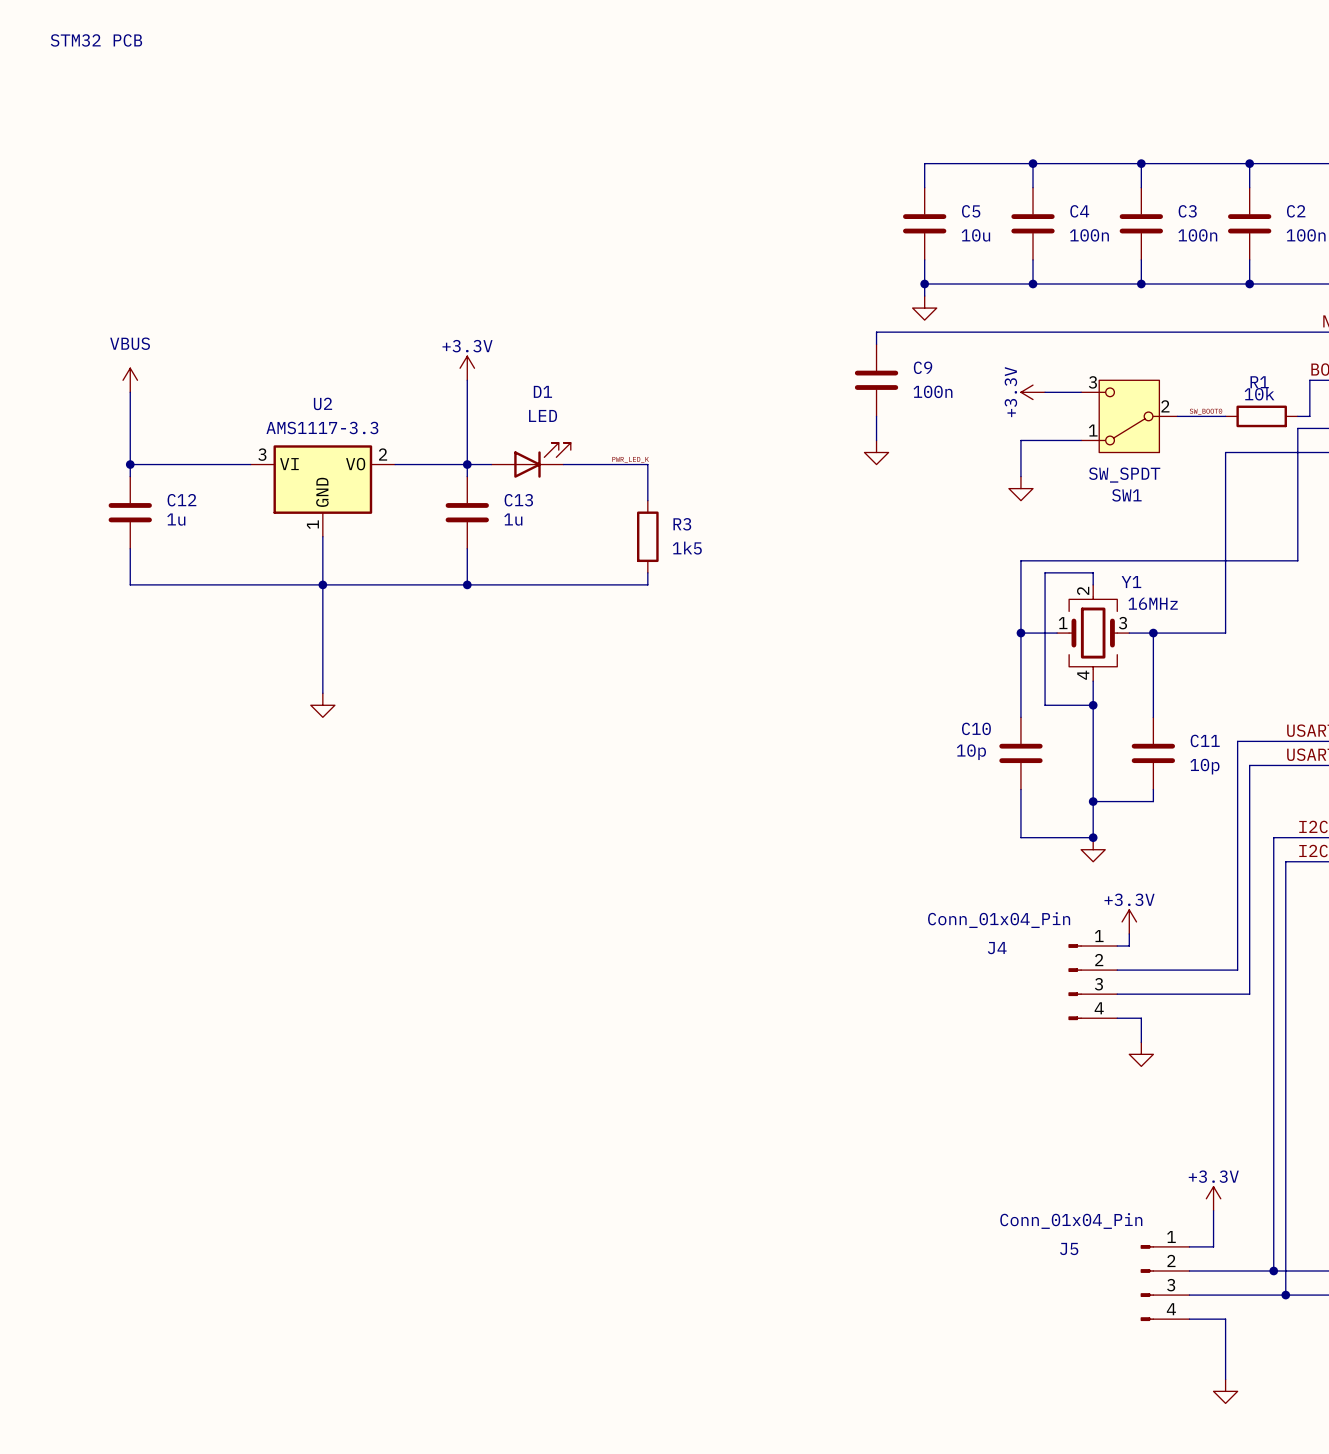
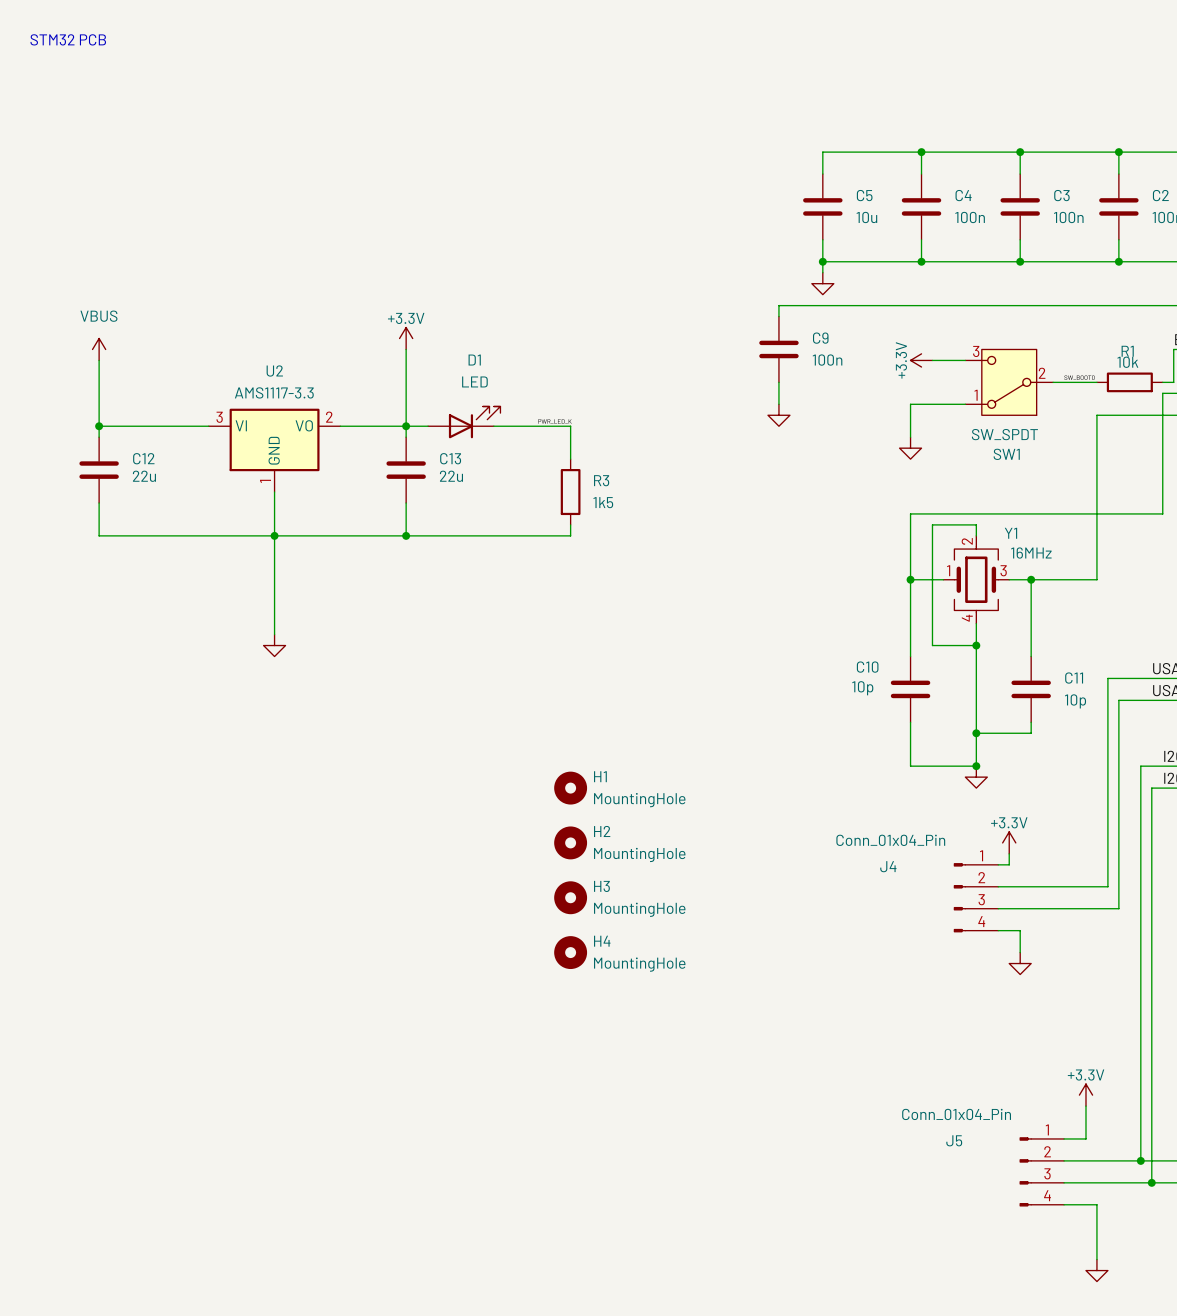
C12 value: 1u (176, 519) -> 22u (144, 476)
C13 value: 1u (513, 519) -> 22u (451, 476)
H1: none -> MountingHole (570, 788)
H2: none -> MountingHole (570, 842)
H3: none -> MountingHole (570, 897)
H4: none -> MountingHole (570, 952)

